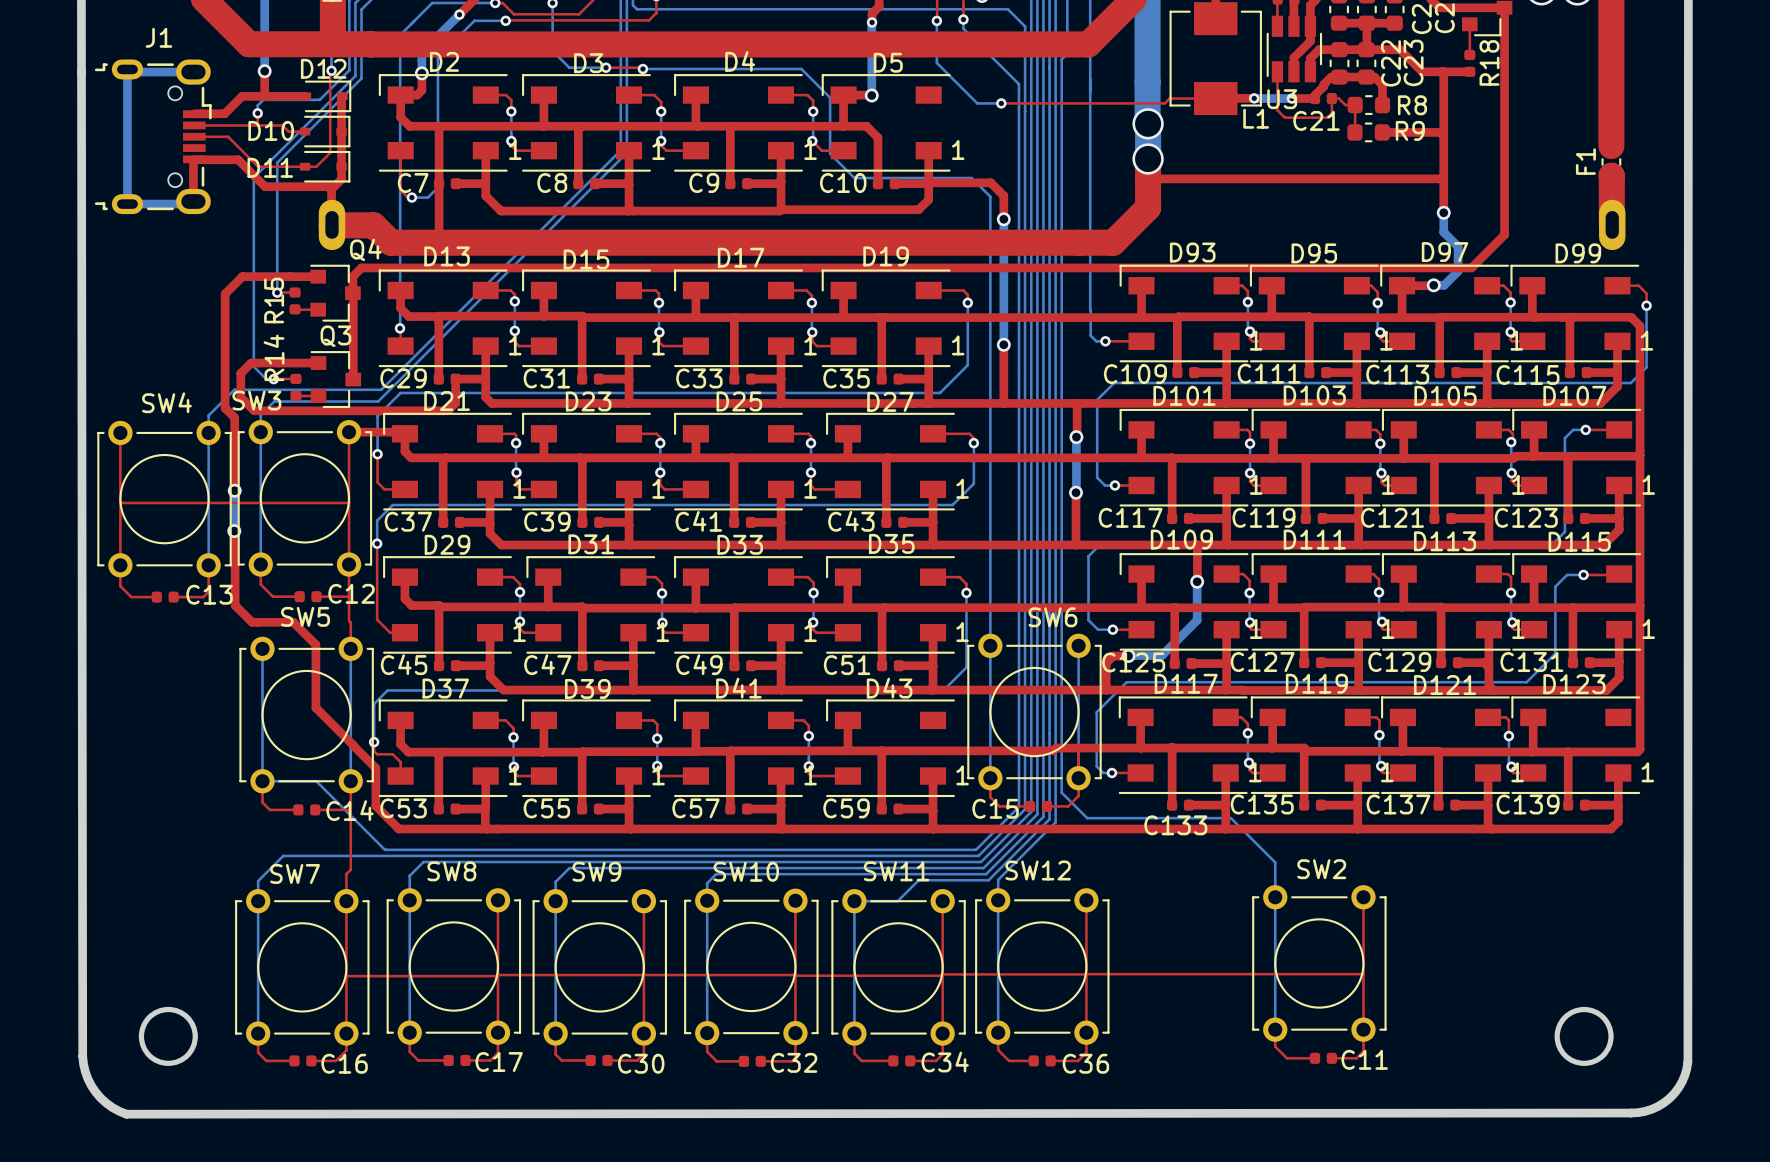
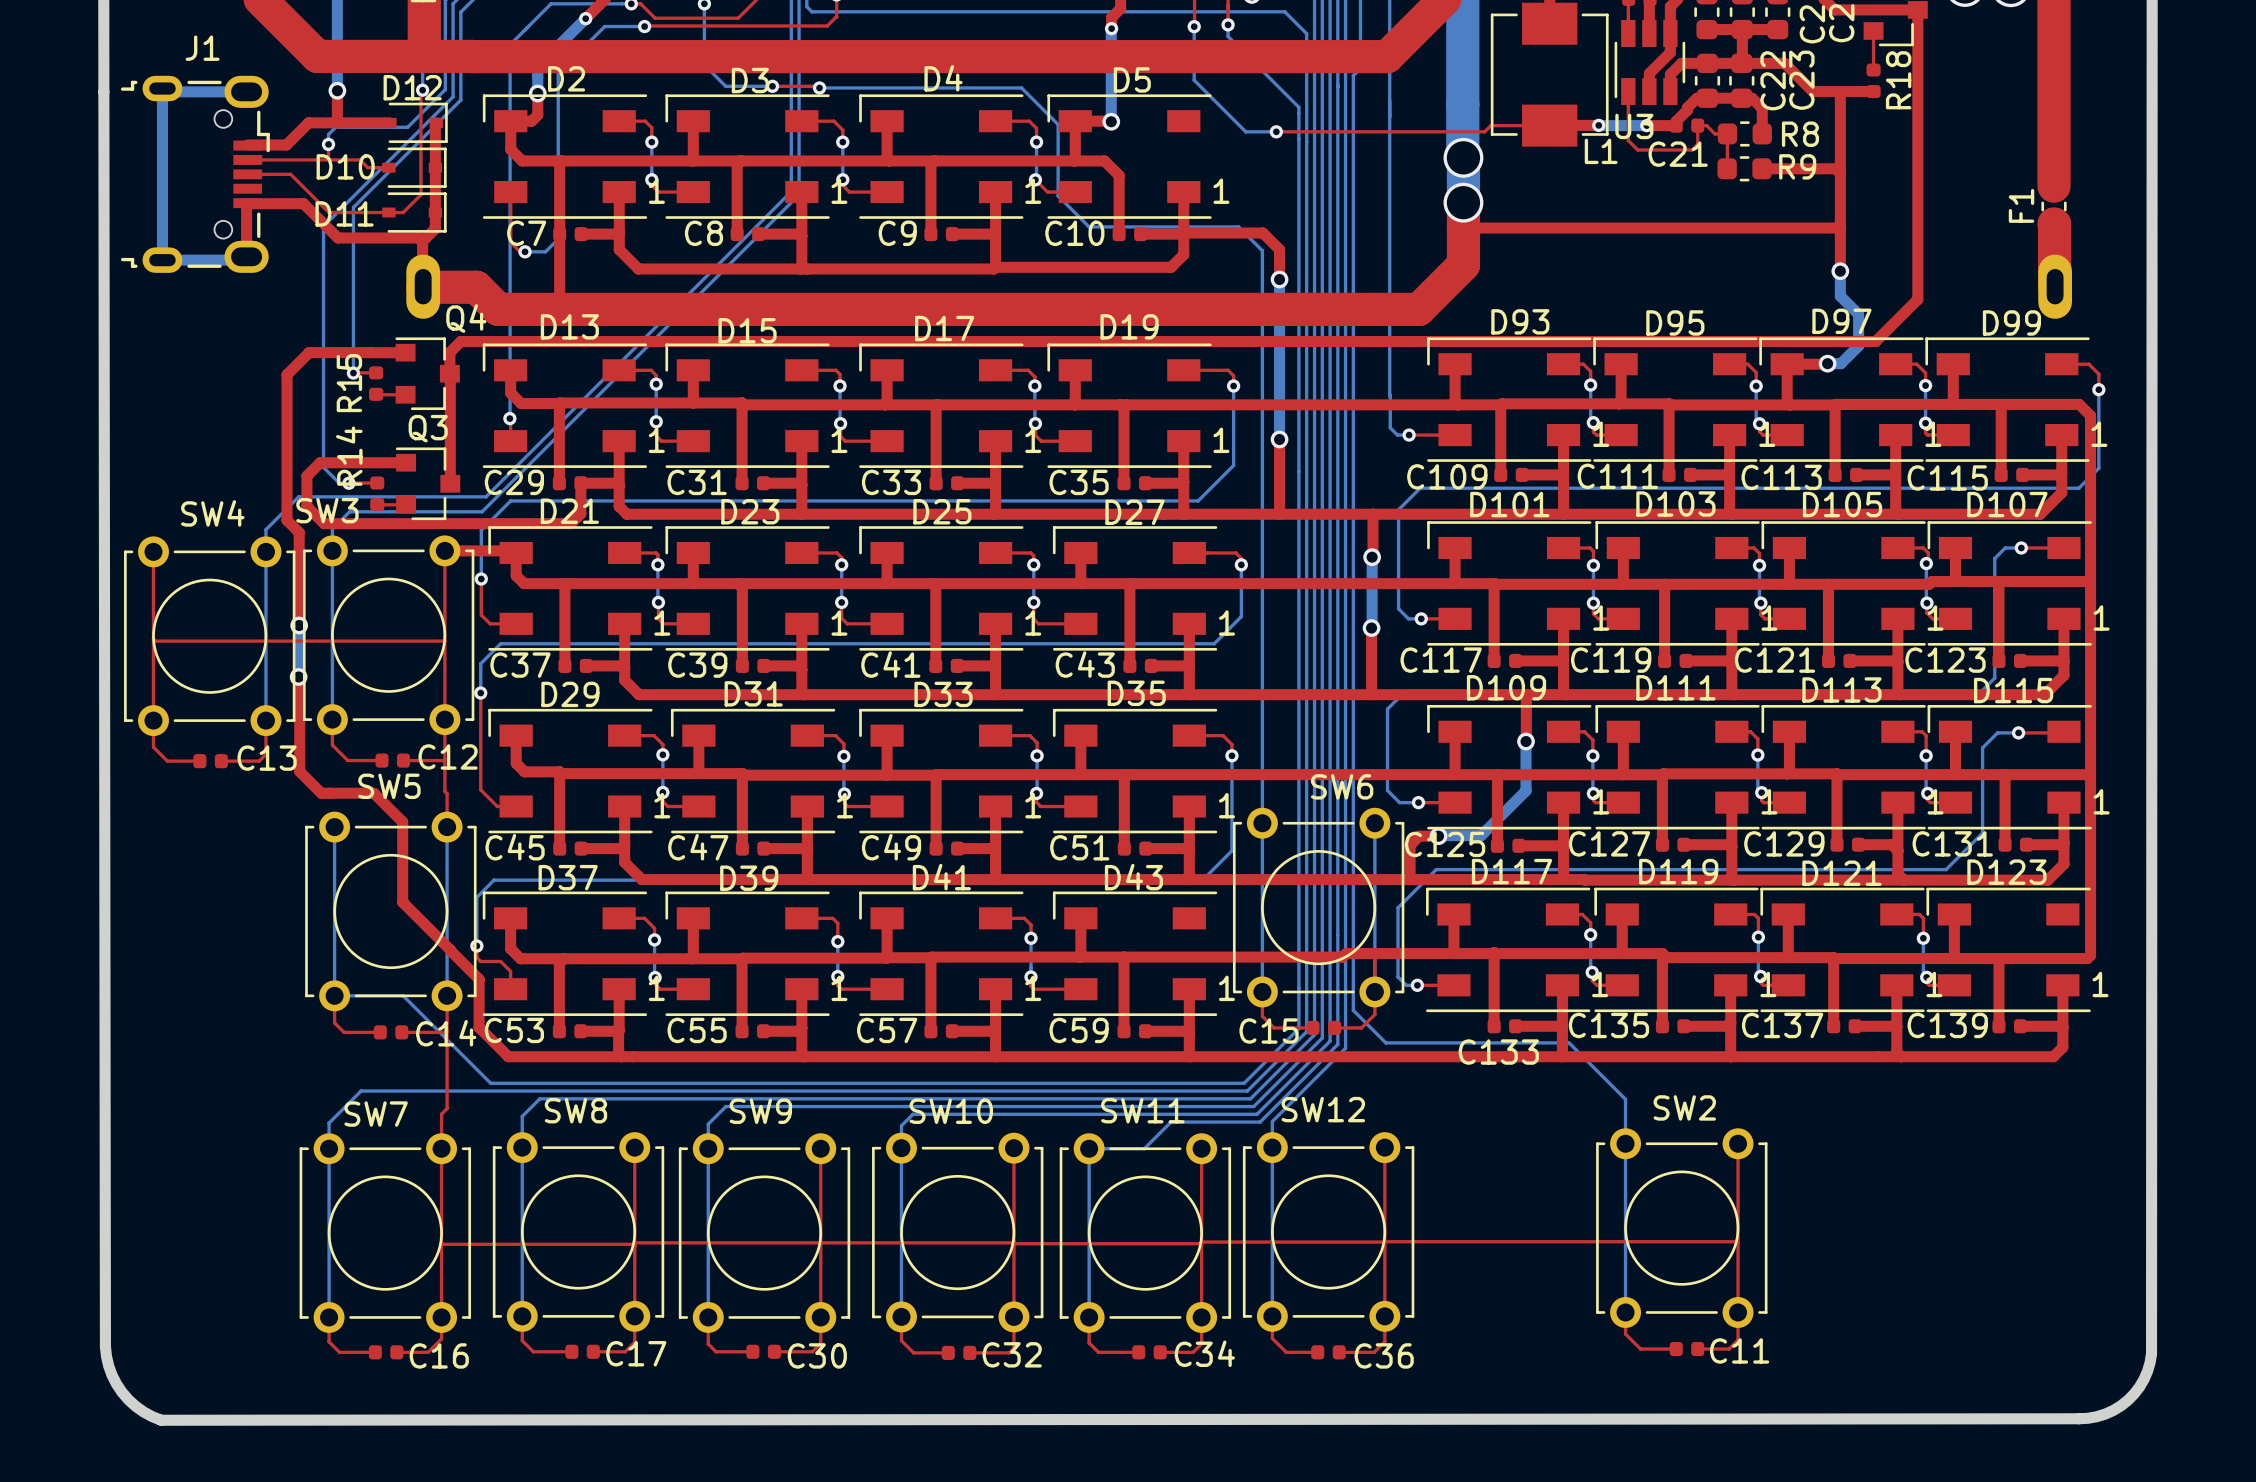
round board edge: [138, 1006, 198, 1066] -> none
round board edge: [1554, 1006, 1614, 1066] -> none

